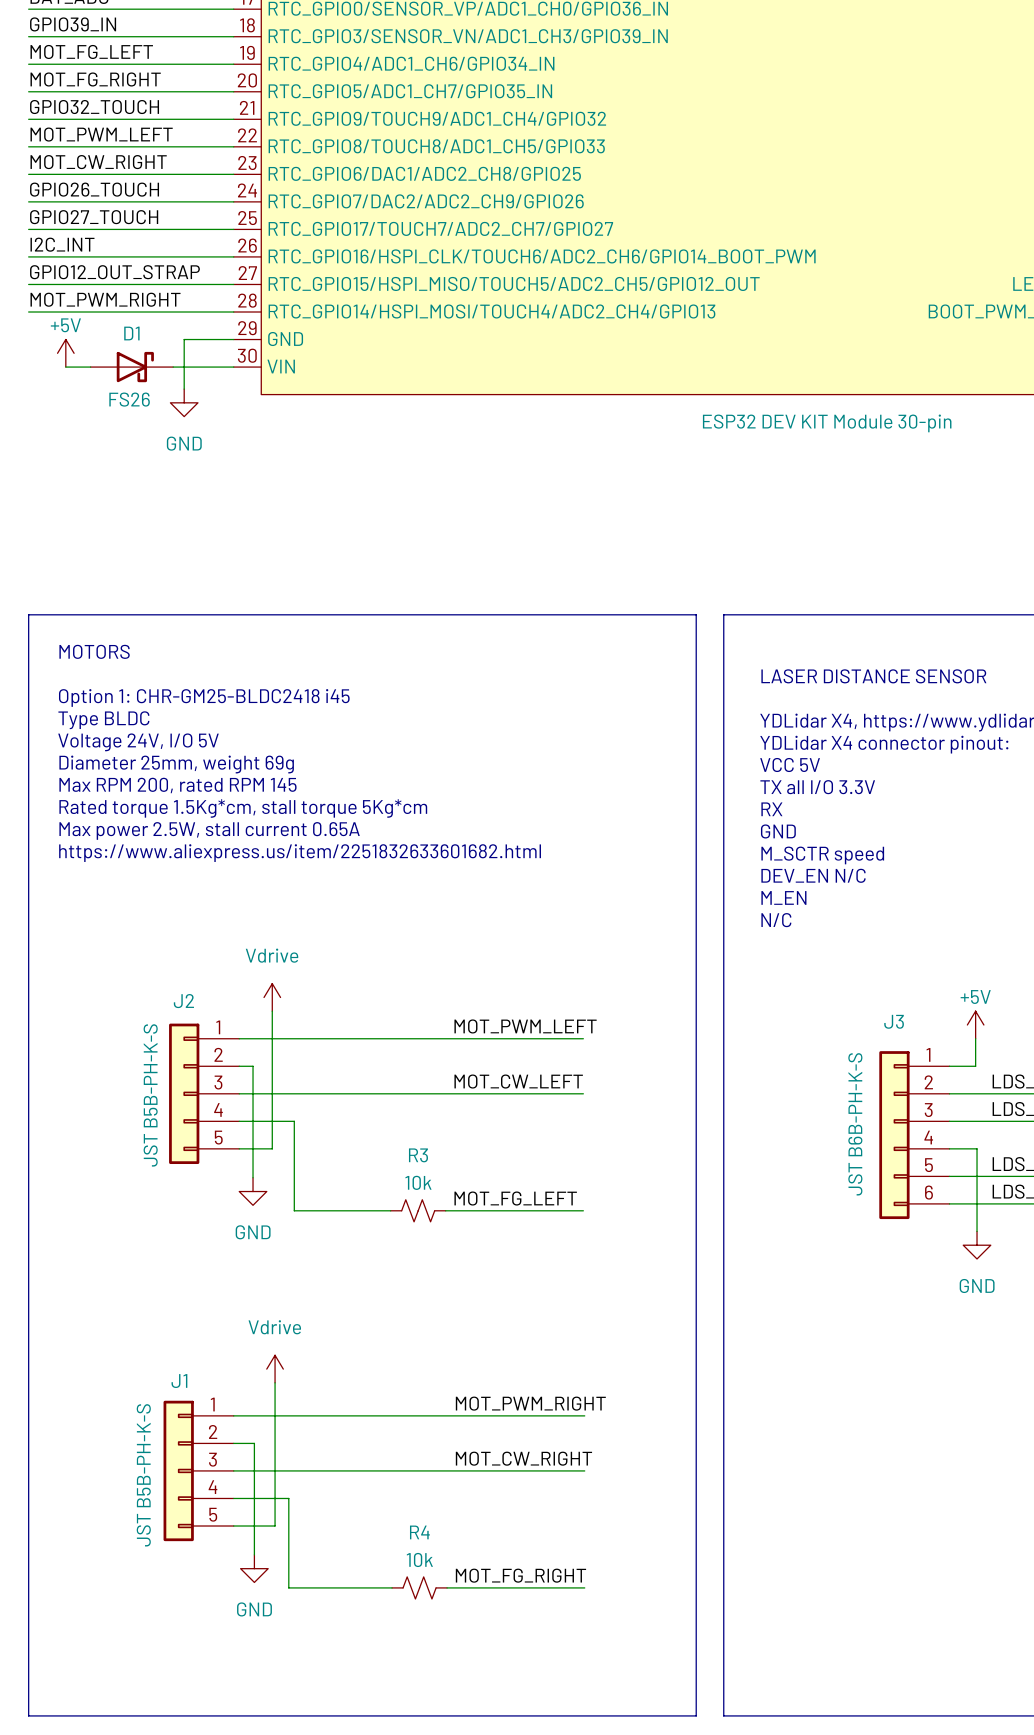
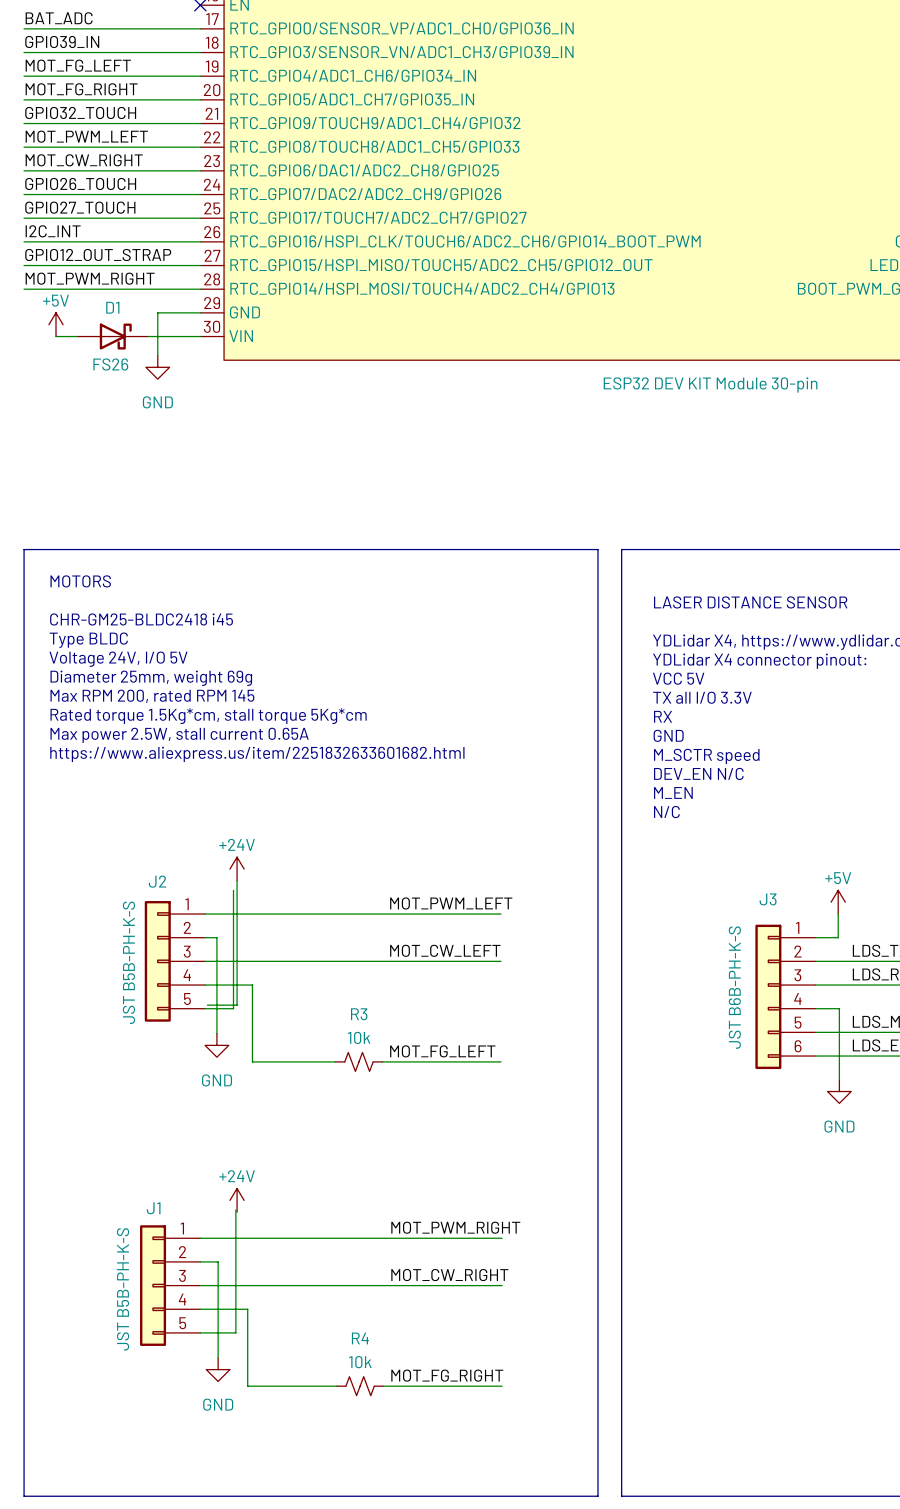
text: Option 1: CHR-GM25-BLDC2418 i45 (204, 697) -> CHR-GM25-BLDC2418 i45 (141, 619)
power symbol: none -> +24V (237, 869)
power symbol: Vdrive (272, 997) -> none
wire: none -> (237, 880) (237, 1005) (207, 1005)
power symbol: Vdrive (275, 1369) -> +24V (237, 1200)

